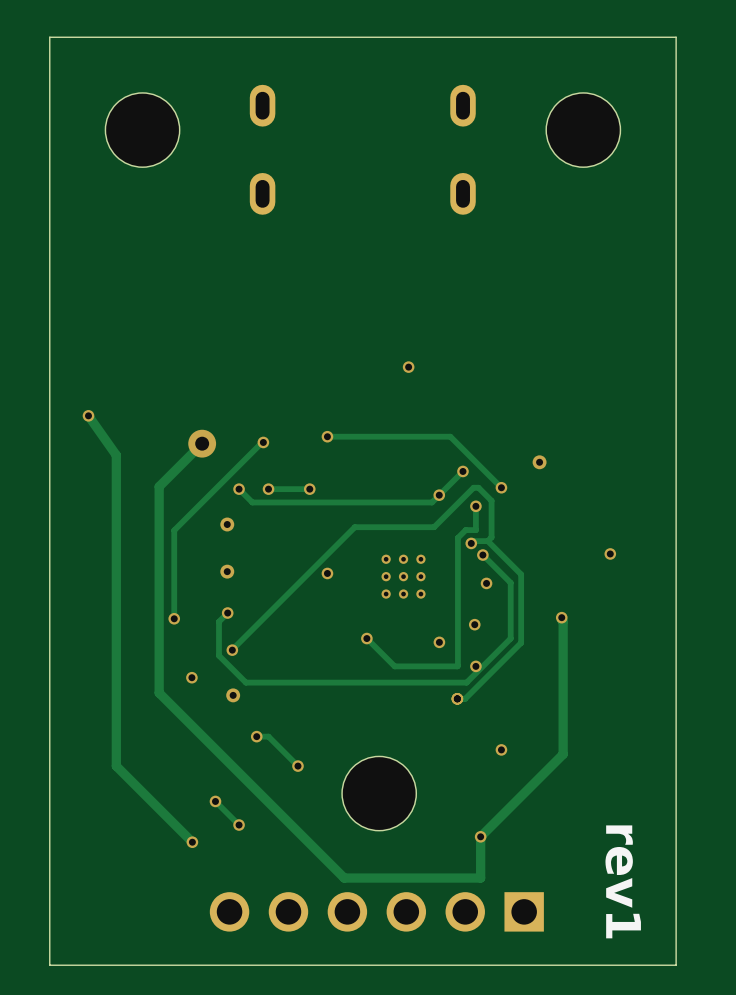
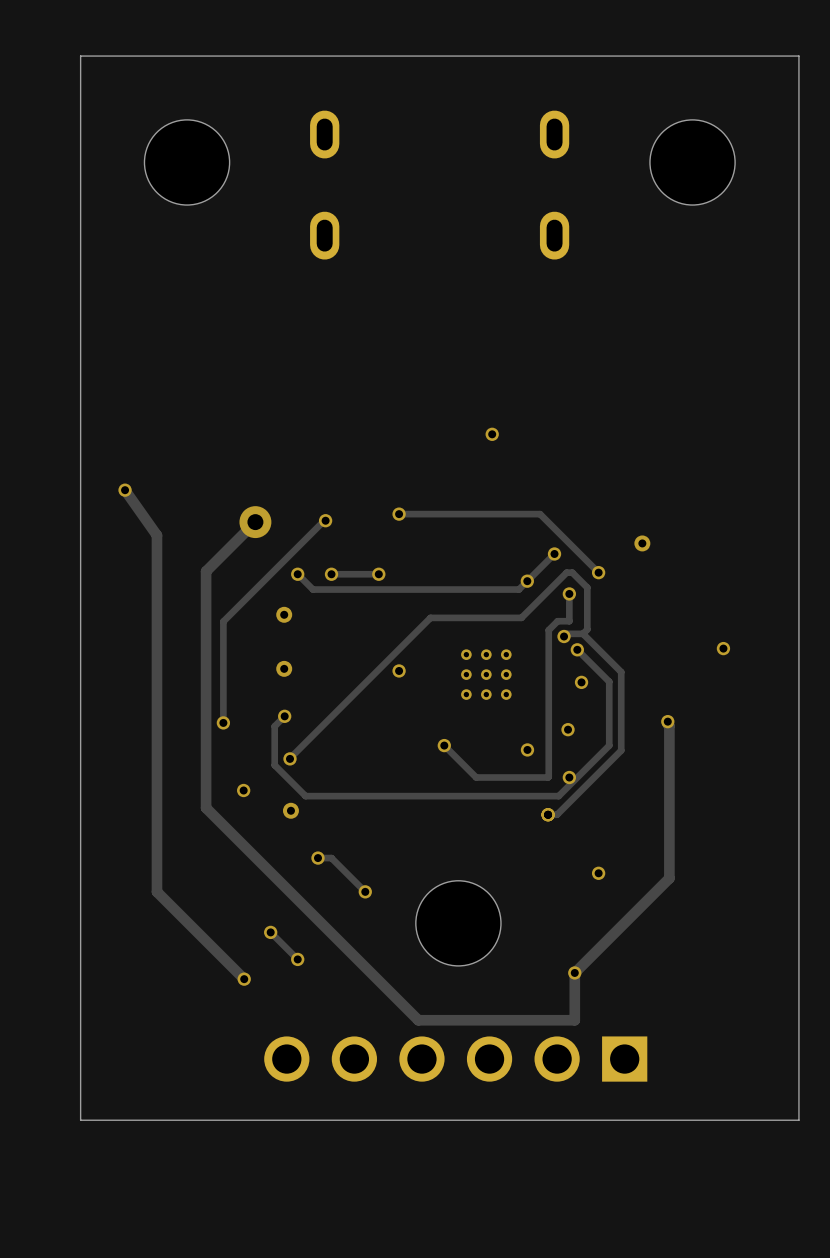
text: rev1 (623, 881) -> none

